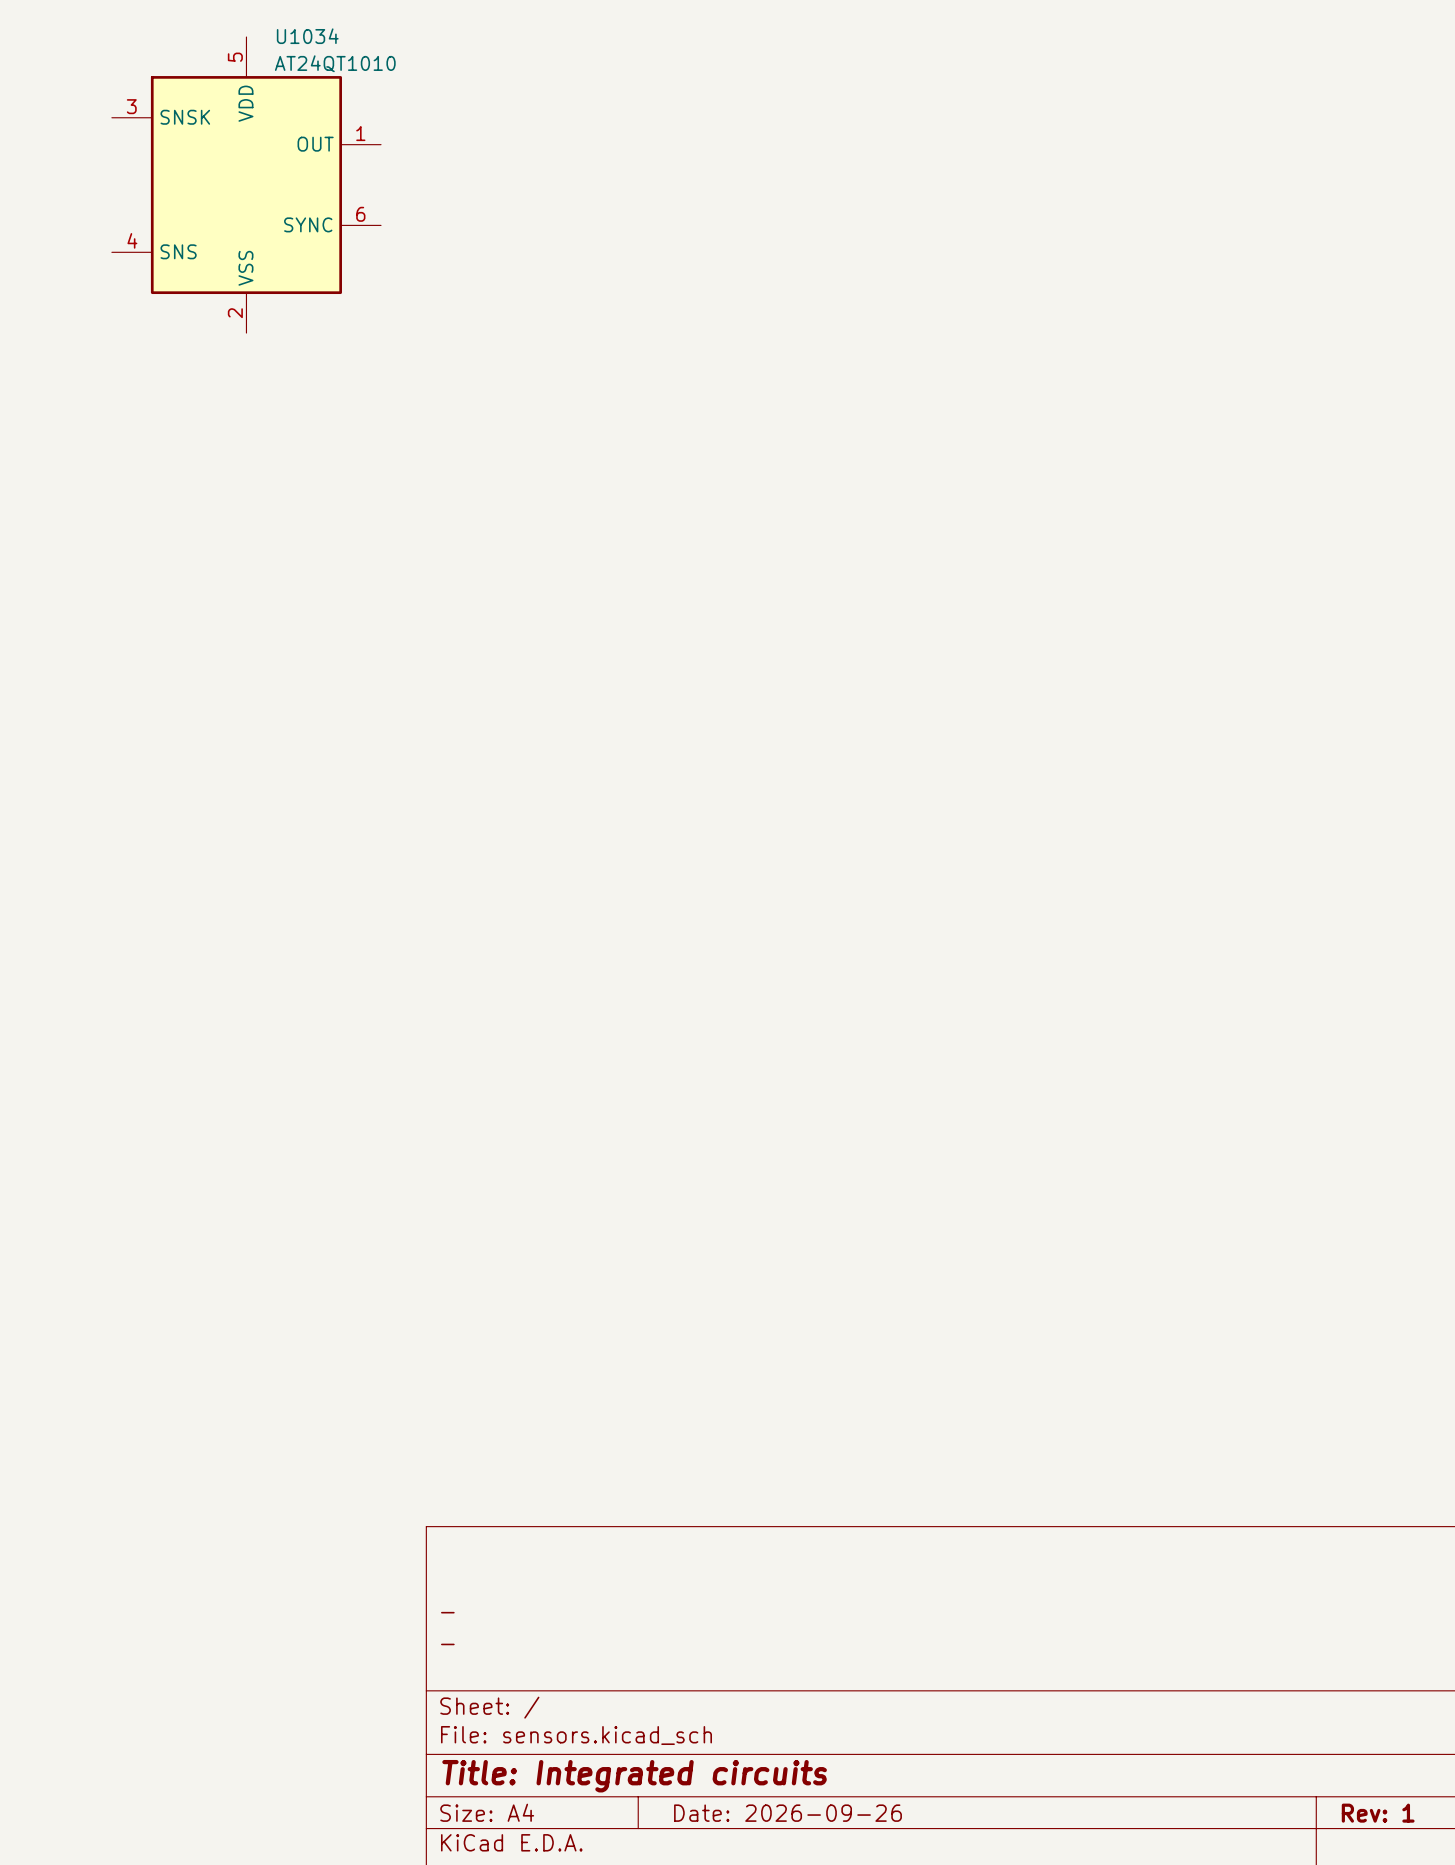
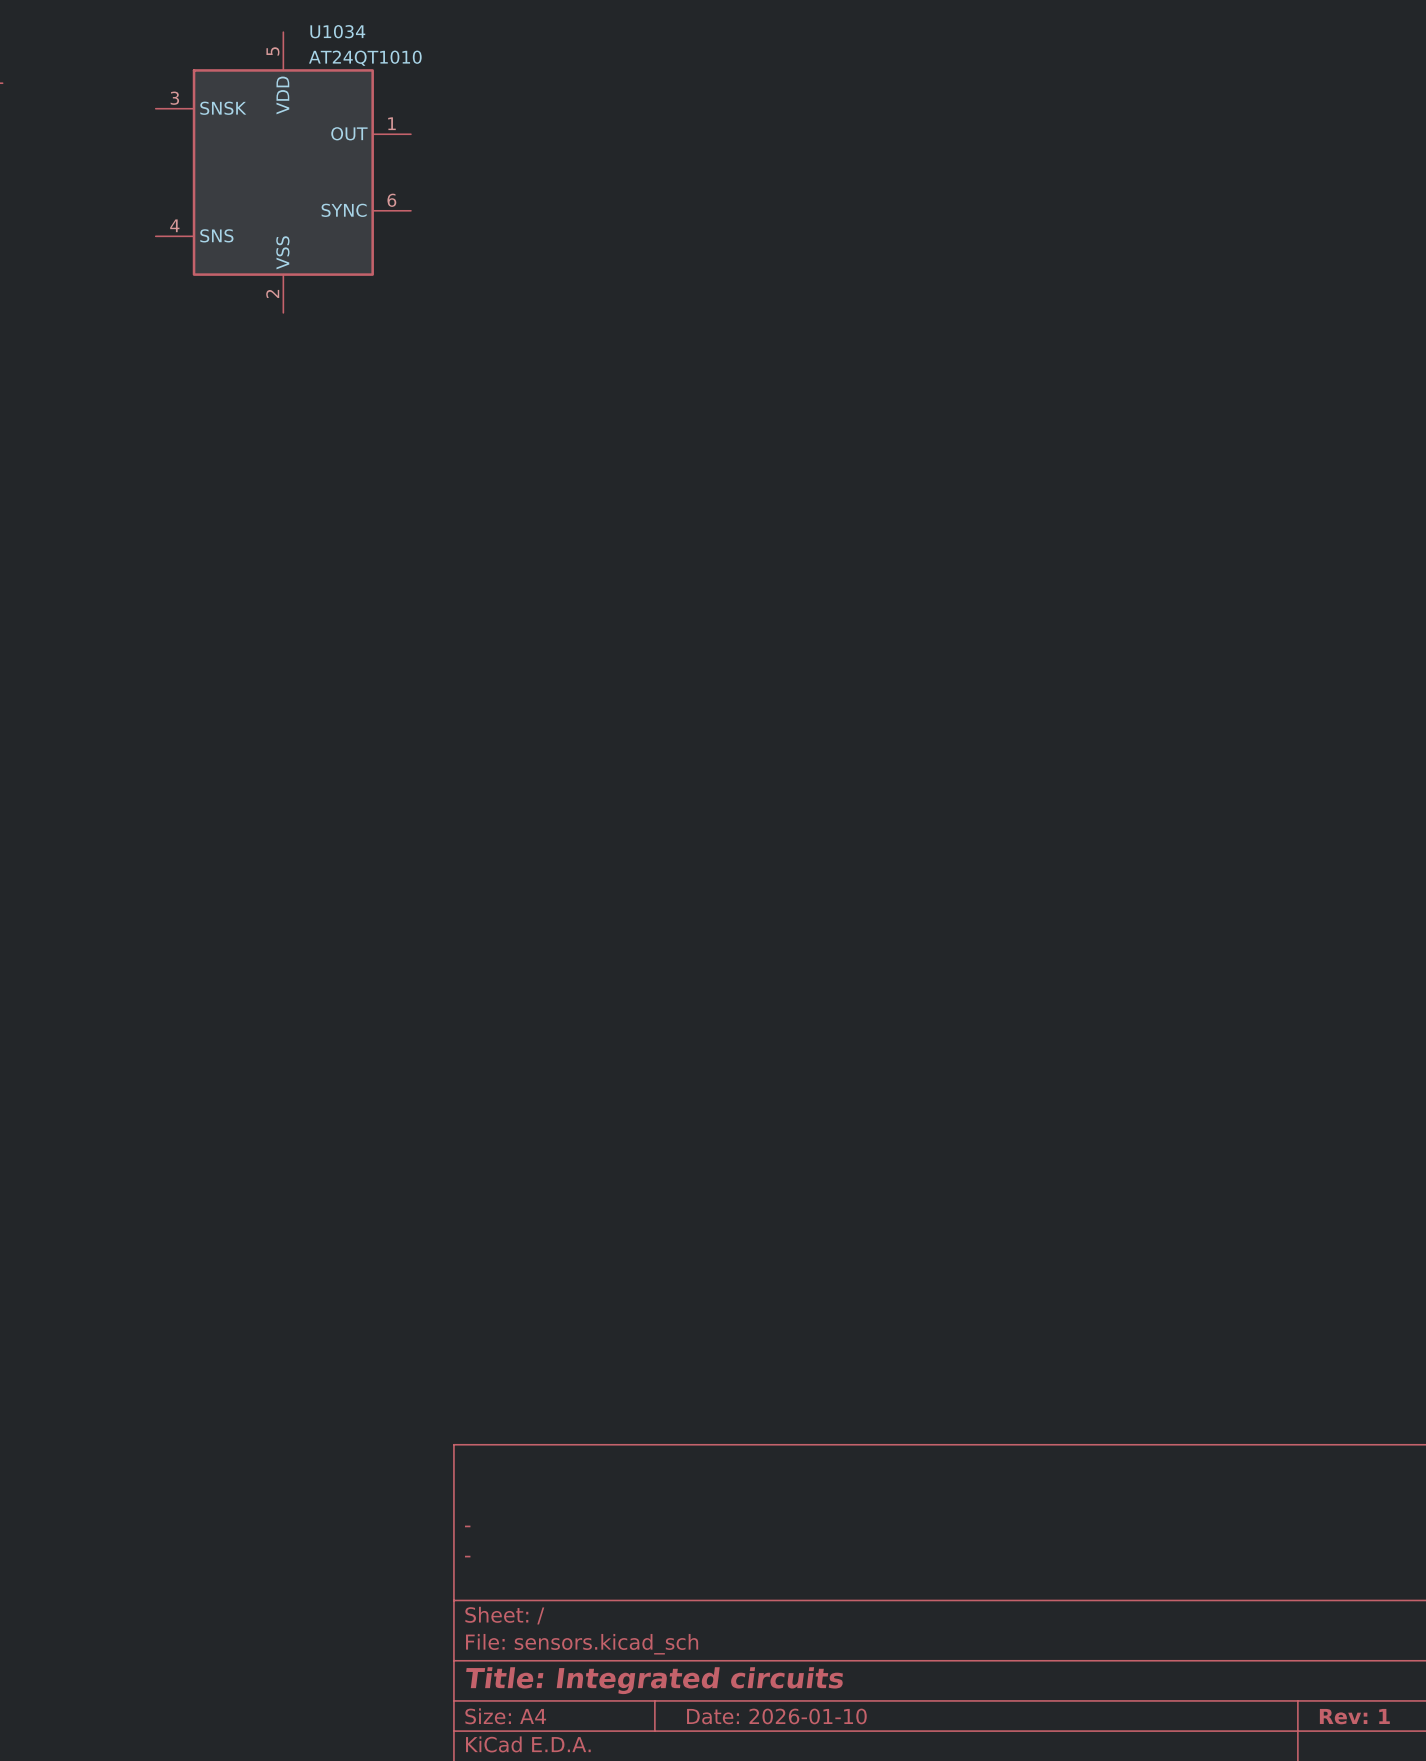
title block: Date: 2026-09-26 (788, 1813) -> Date: 2026-01-10 (776, 1716)

